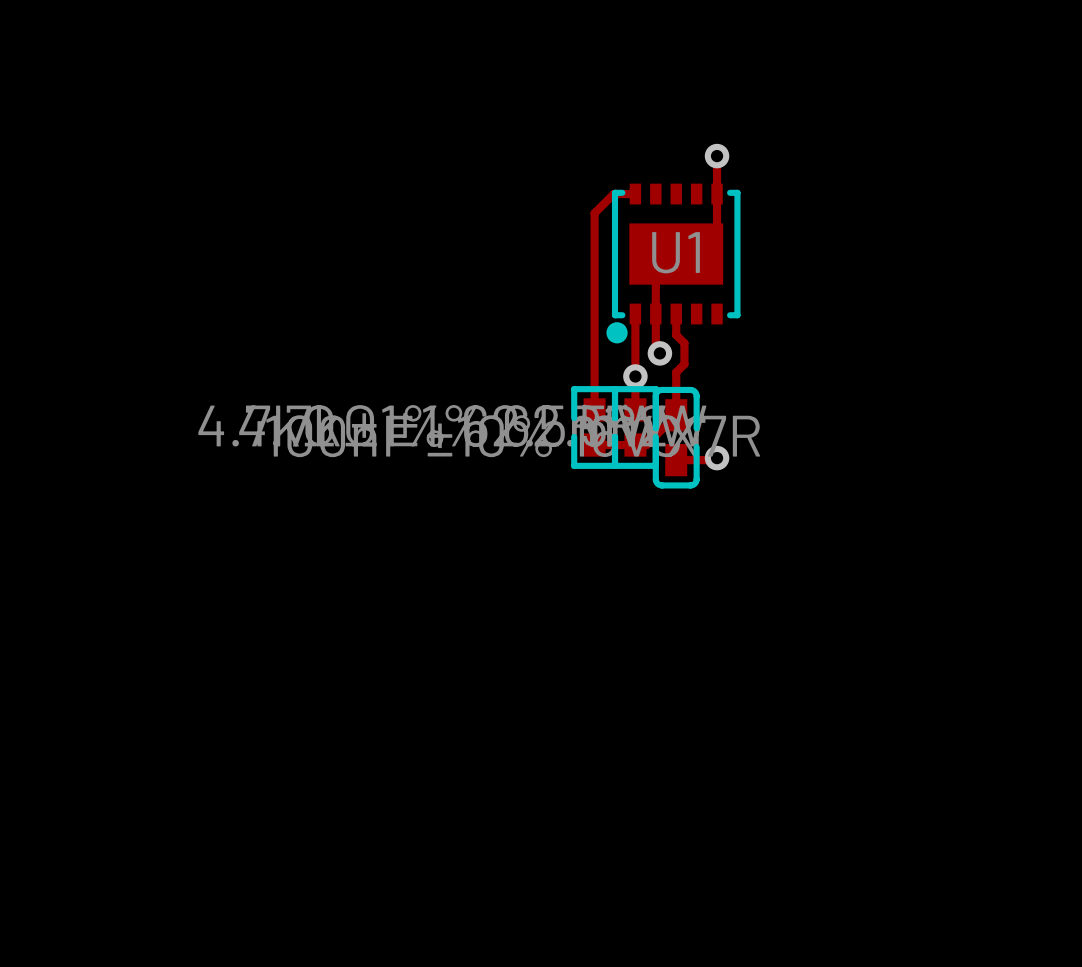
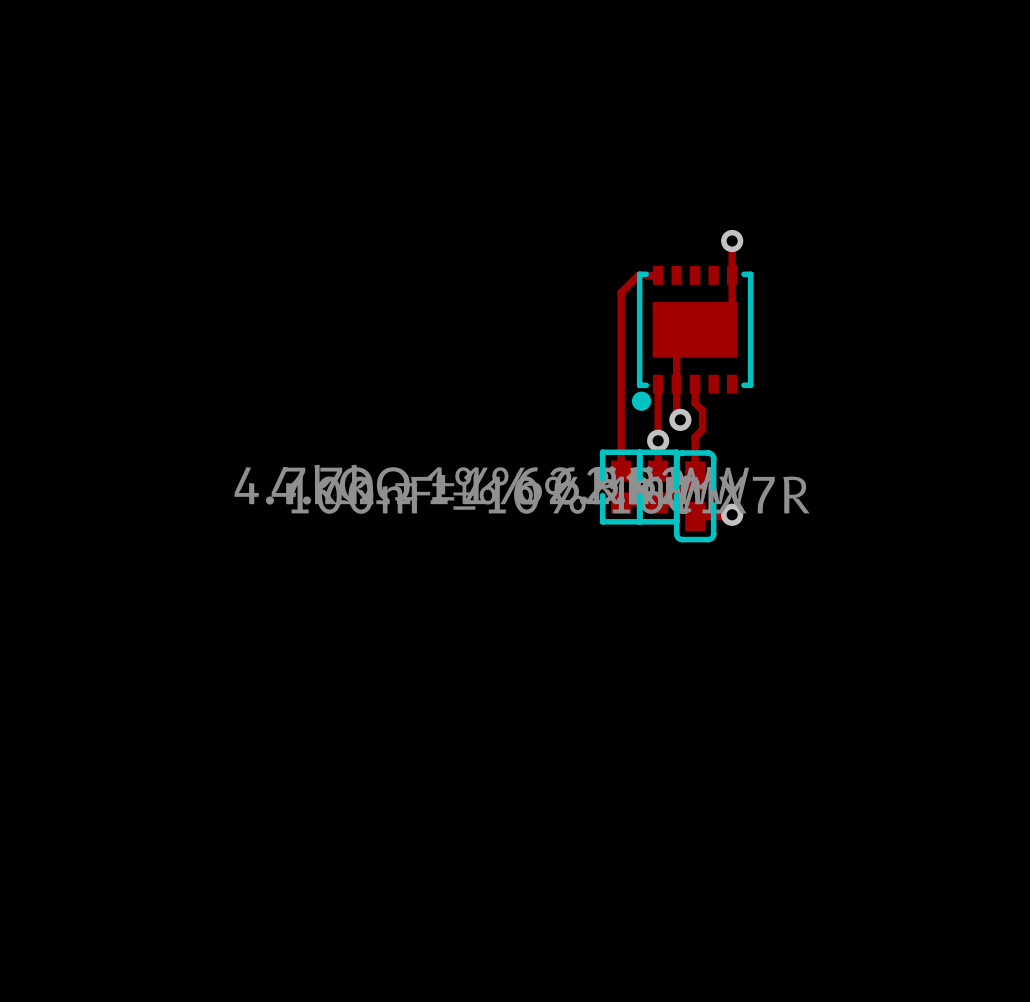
U1 name: U1 (676, 252) -> none

